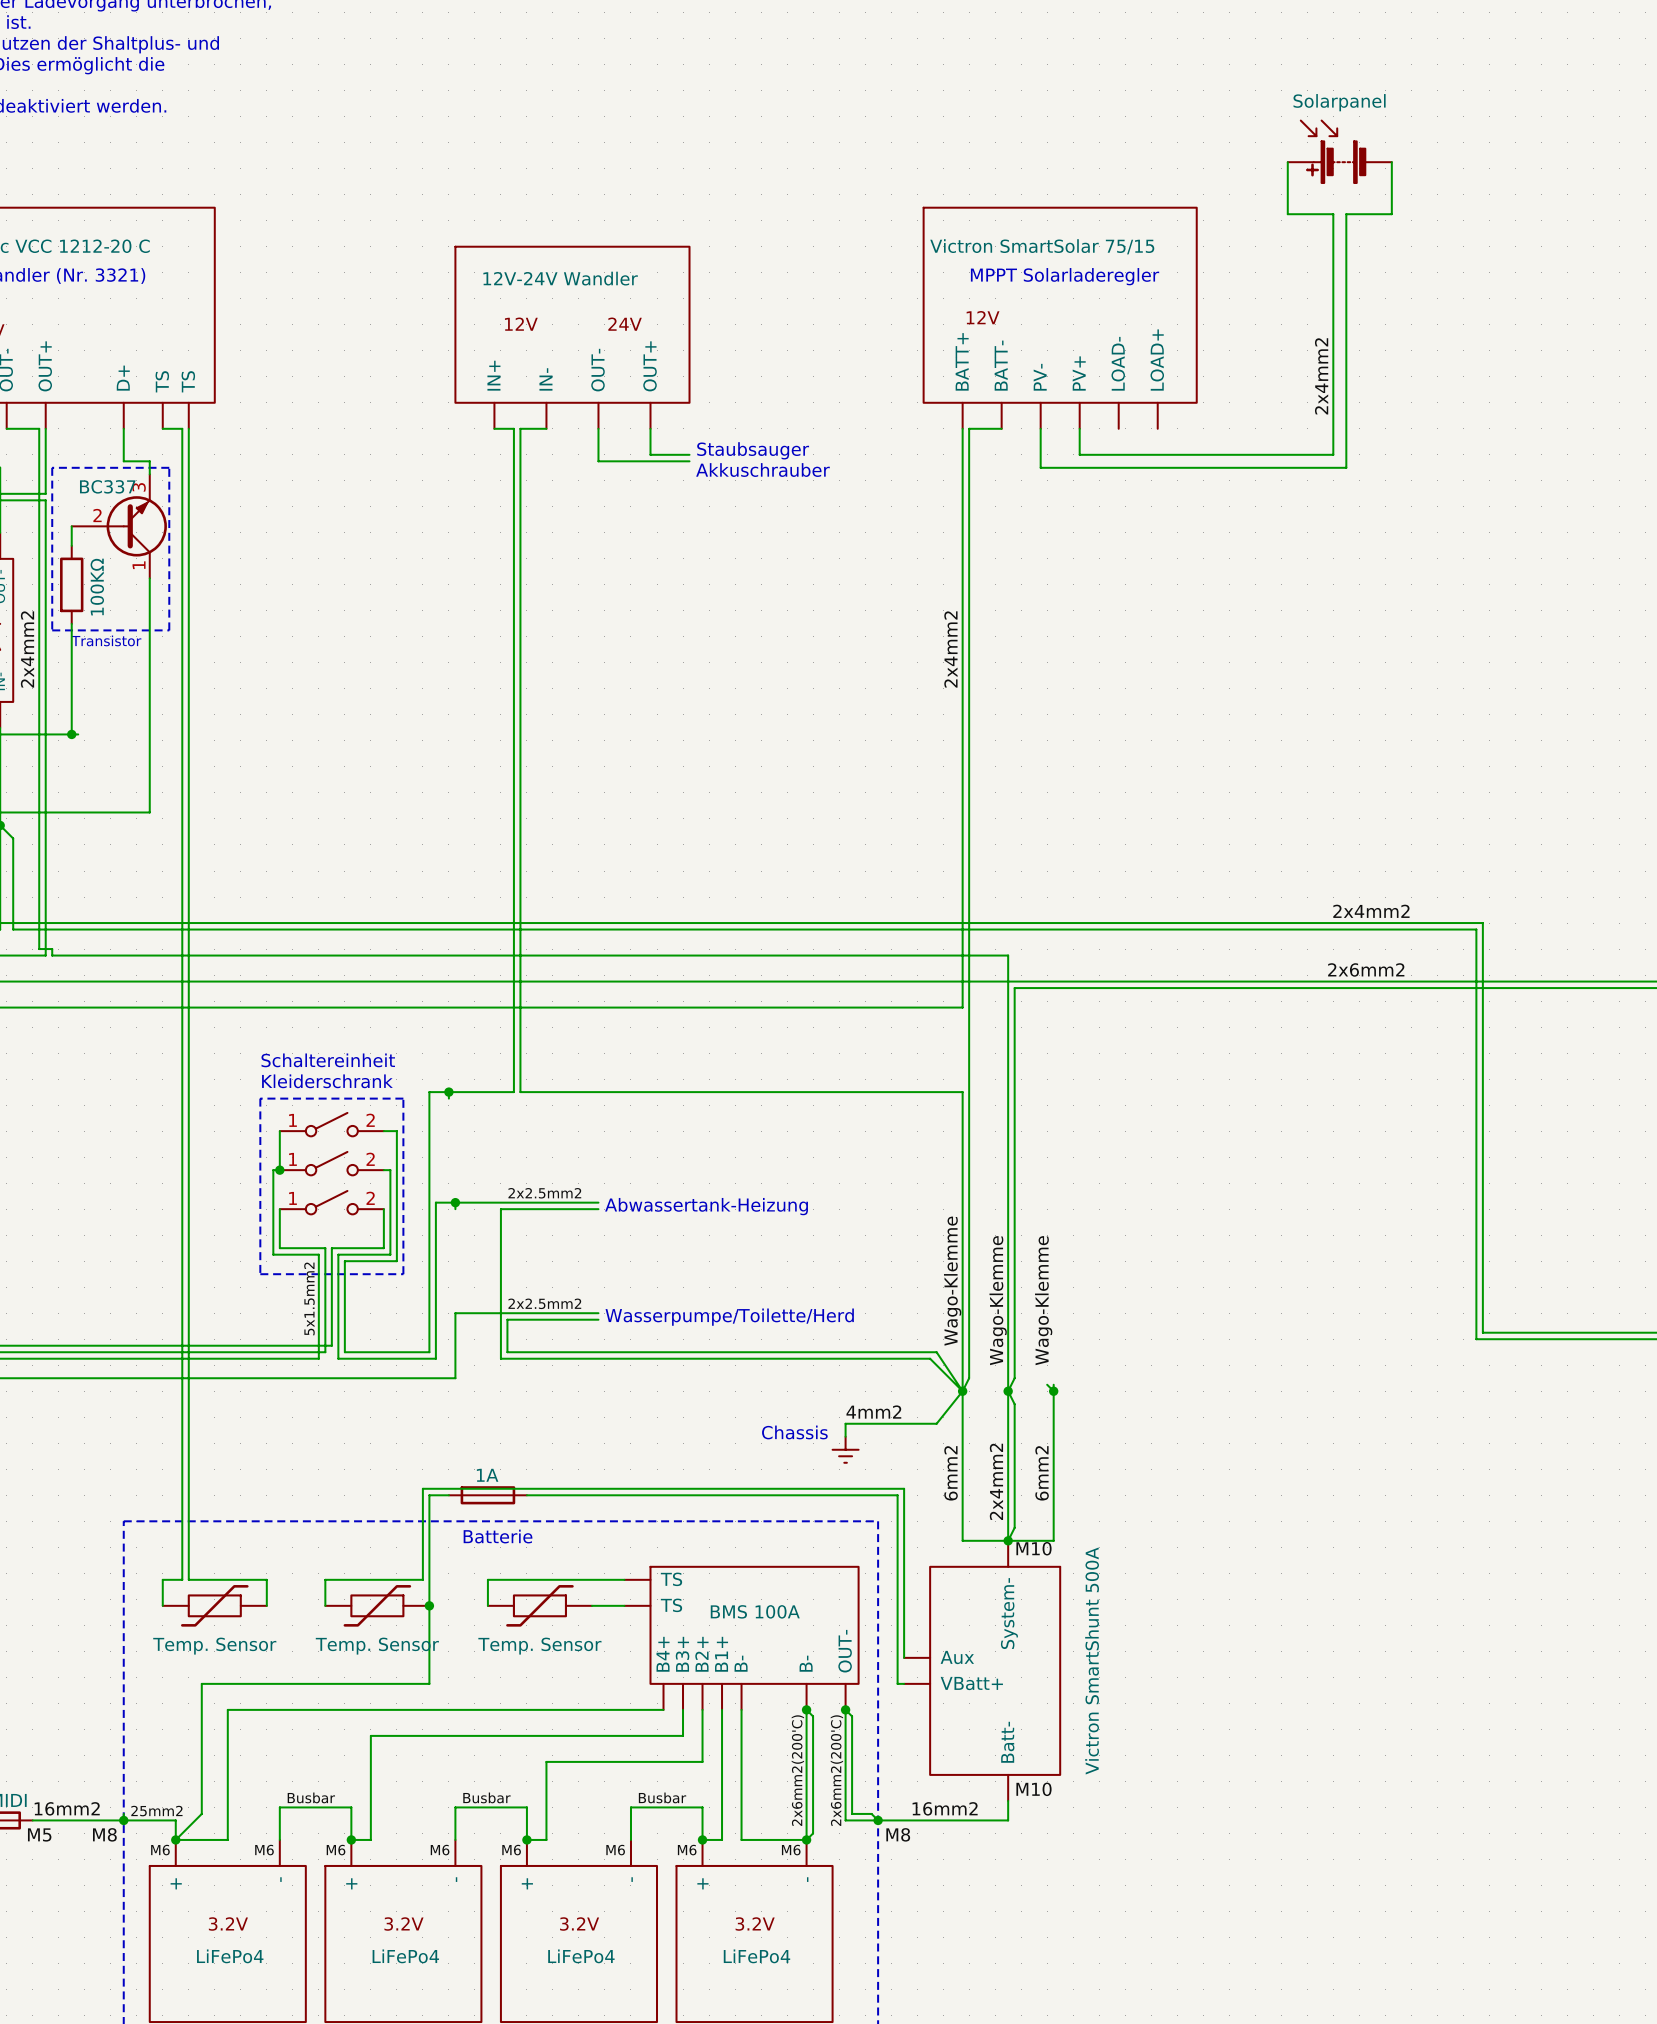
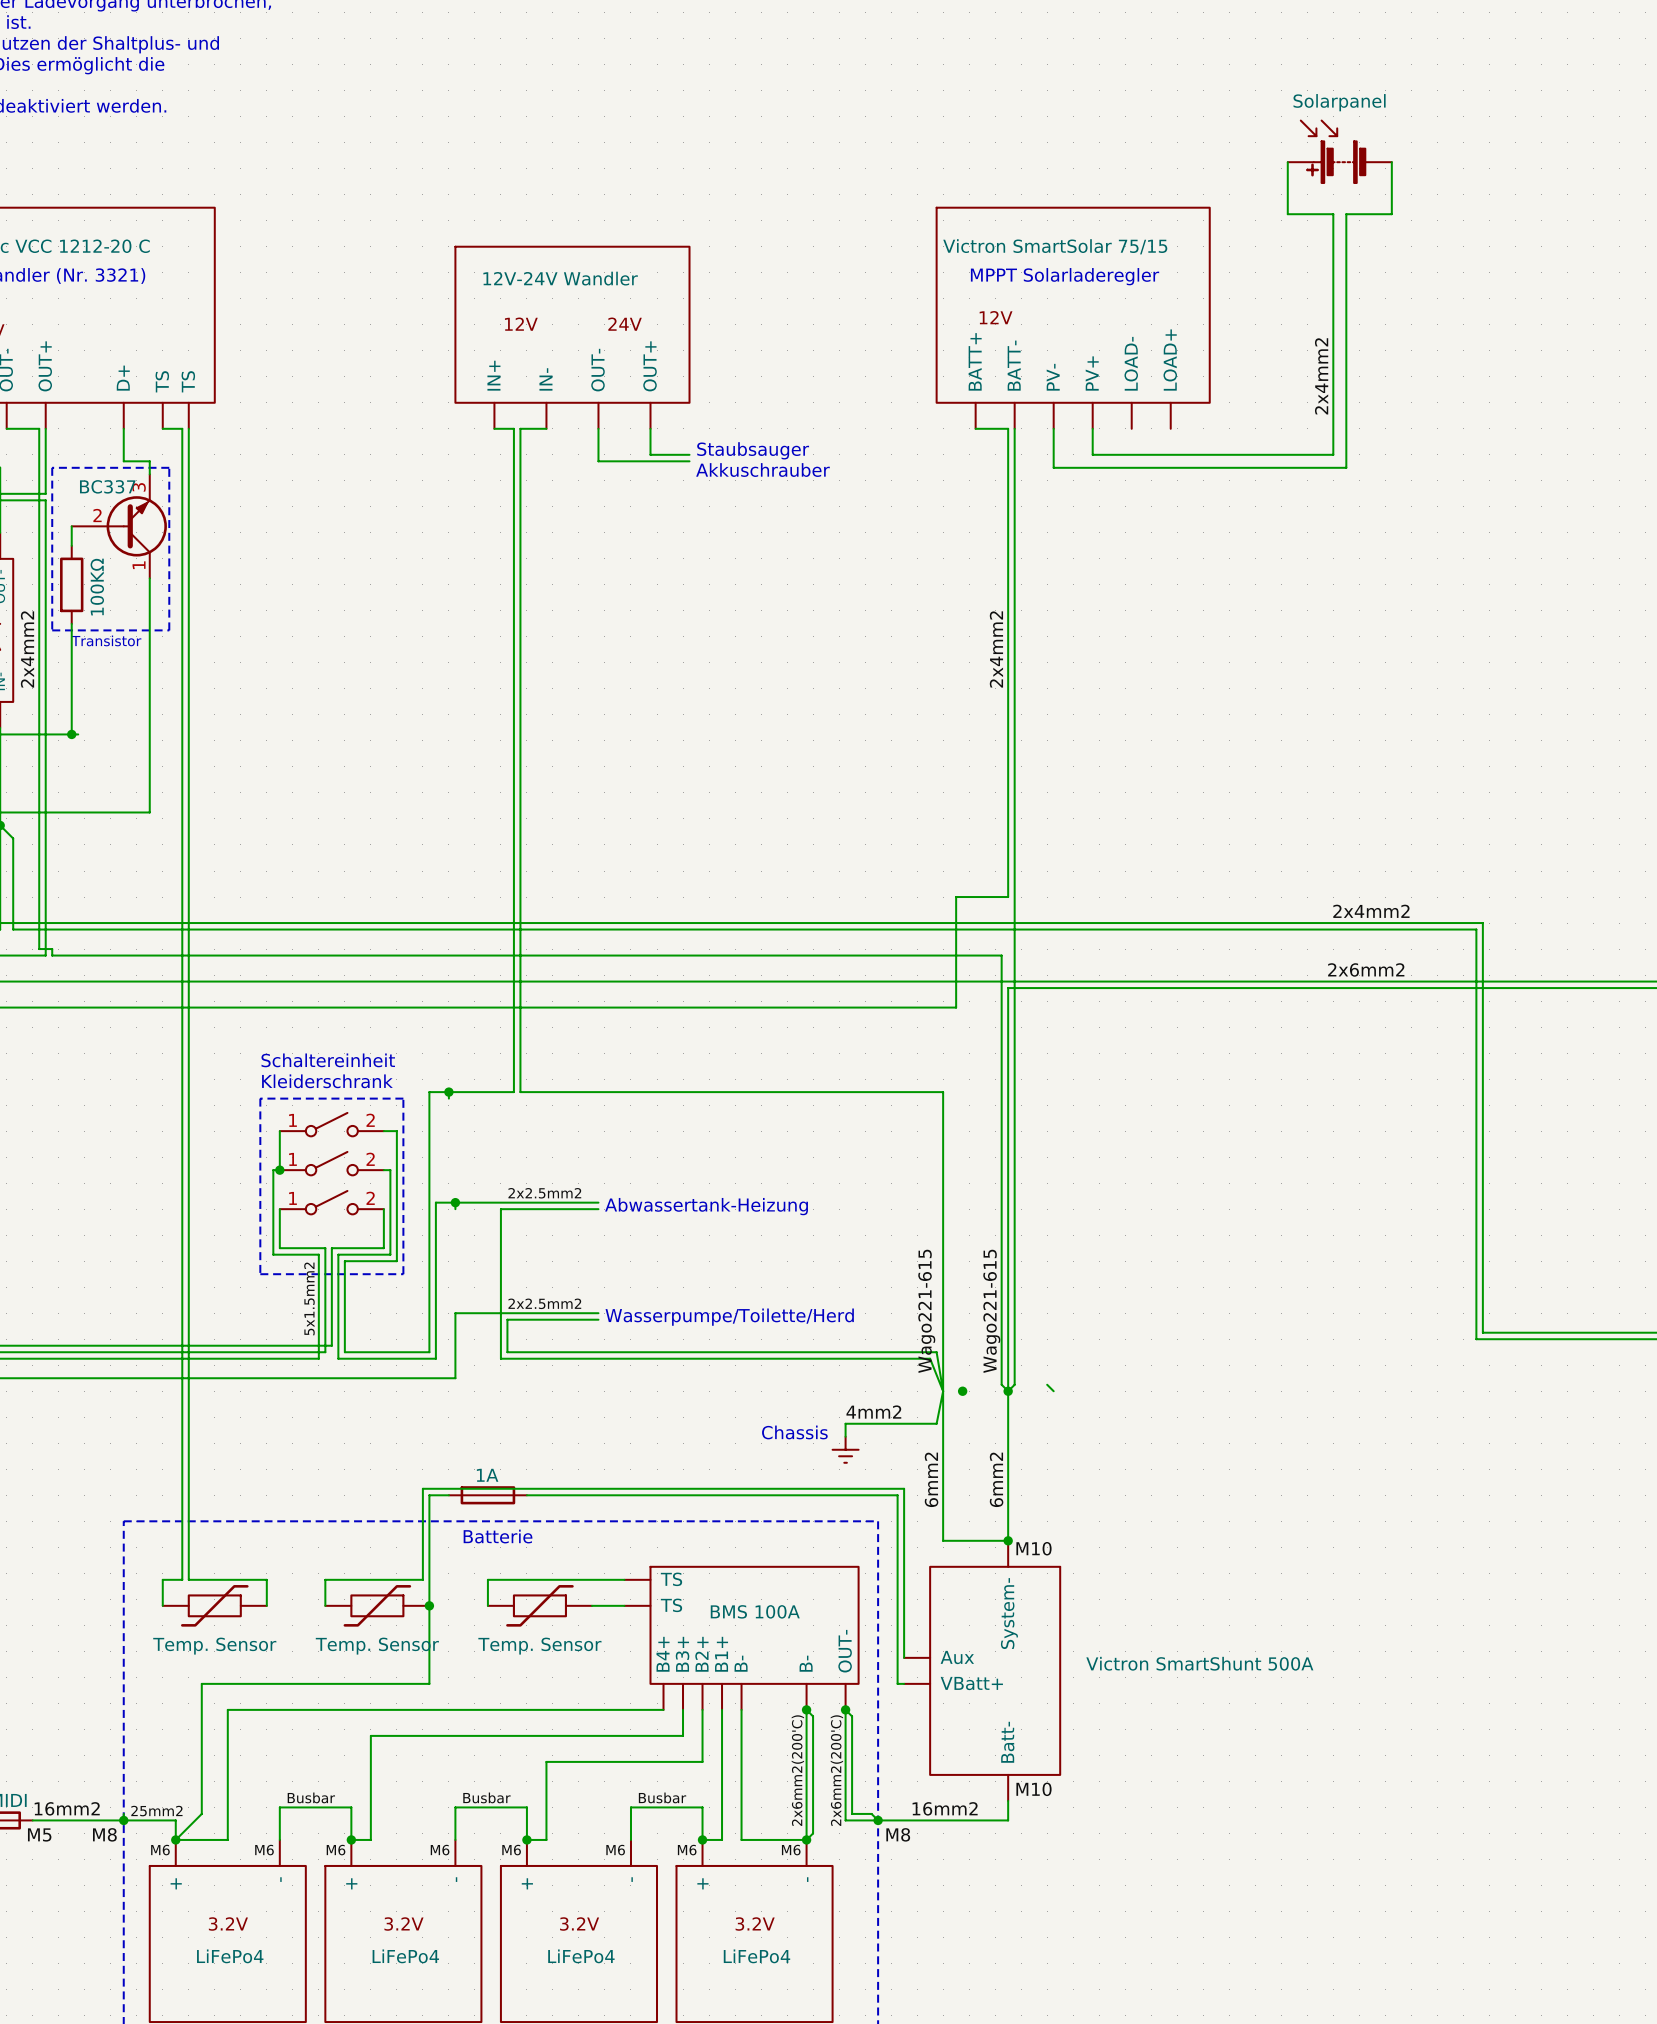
part position: (1060, 318) -> (1073, 318)
wire: (962, 428) (962, 1007) (956, 1007) -> (1001, 428) (1008, 428) (1008, 897) (956, 897) (956, 1007)
wire: (975, 428) (969, 428) (969, 1378) (962, 1391) -> none
wire: none -> (1014, 428) (1014, 988) (1008, 988)
wire: (1040, 428) (1040, 467) (1053, 467) -> (1053, 428) (1053, 467)
wire: (1079, 428) (1079, 454) (1092, 454) -> (1092, 428) (1092, 454)
label position: 2x4mm2 (950, 649) -> 2x4mm2 (996, 649)
wire: (1001, 955) (1008, 955) (1008, 988) -> (1001, 955) (1001, 1384) (1008, 1391) (1014, 1384) (1014, 1378)
wire: (943, 1092) (962, 1092) (962, 1540) -> (943, 1092) (943, 1540) (962, 1540)
label: Wago-Klemme (952, 1281) -> none
label: Wago-Klemme (998, 1300) -> none
label: Wago-Klemme (1043, 1300) -> none
label: none -> Wago221-615 (926, 1311)
label: none -> Wago221-615 (991, 1311)
wire: (936, 1352) (962, 1391) -> (936, 1352) (943, 1391)
wire: (930, 1358) (962, 1391) -> (930, 1358) (943, 1391)
wire: (1014, 1378) (1008, 1391) (1014, 1404) (1014, 1527) (1008, 1540) (1053, 1540) (1053, 1384) -> none
wire: (962, 1391) (936, 1423) -> (943, 1391) (936, 1423)
junction: (1053, 1391) -> none
label position: 6mm2 (951, 1473) -> 6mm2 (931, 1479)
label: 6mm2 (1042, 1473) -> none
label: none -> 6mm2 (996, 1479)
label: 2x4mm2 (996, 1481) -> none
part value rotation: 0° (1092, 1660) -> 90° clockwise (1199, 1663)

